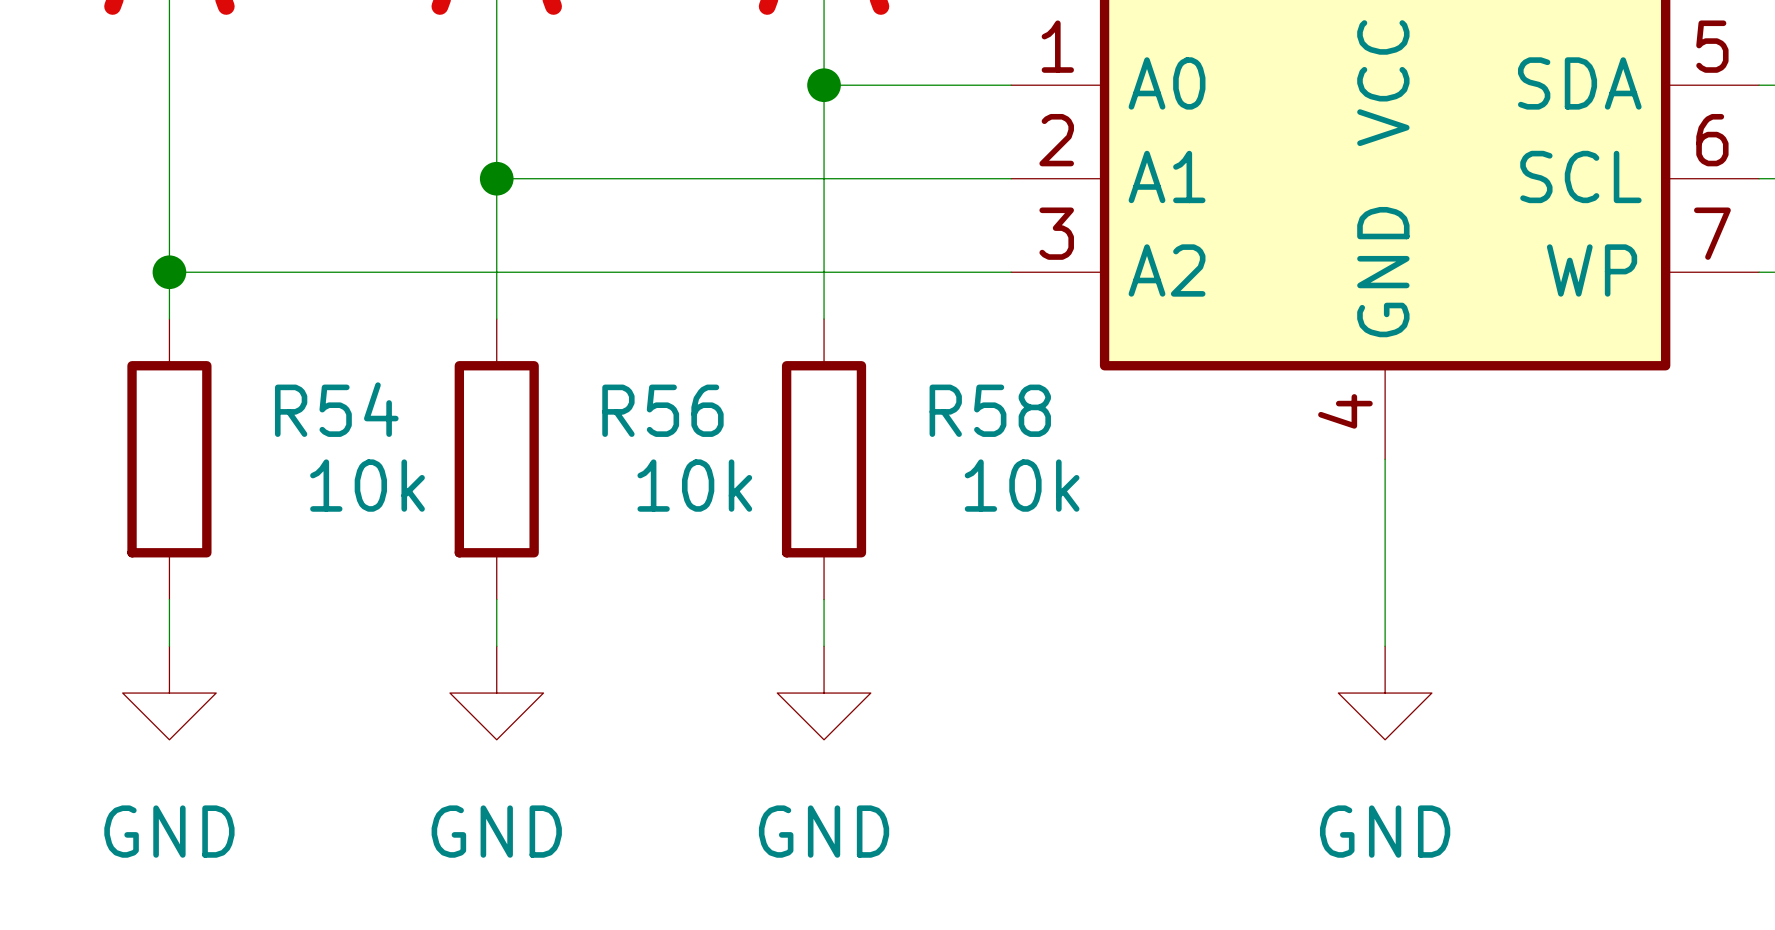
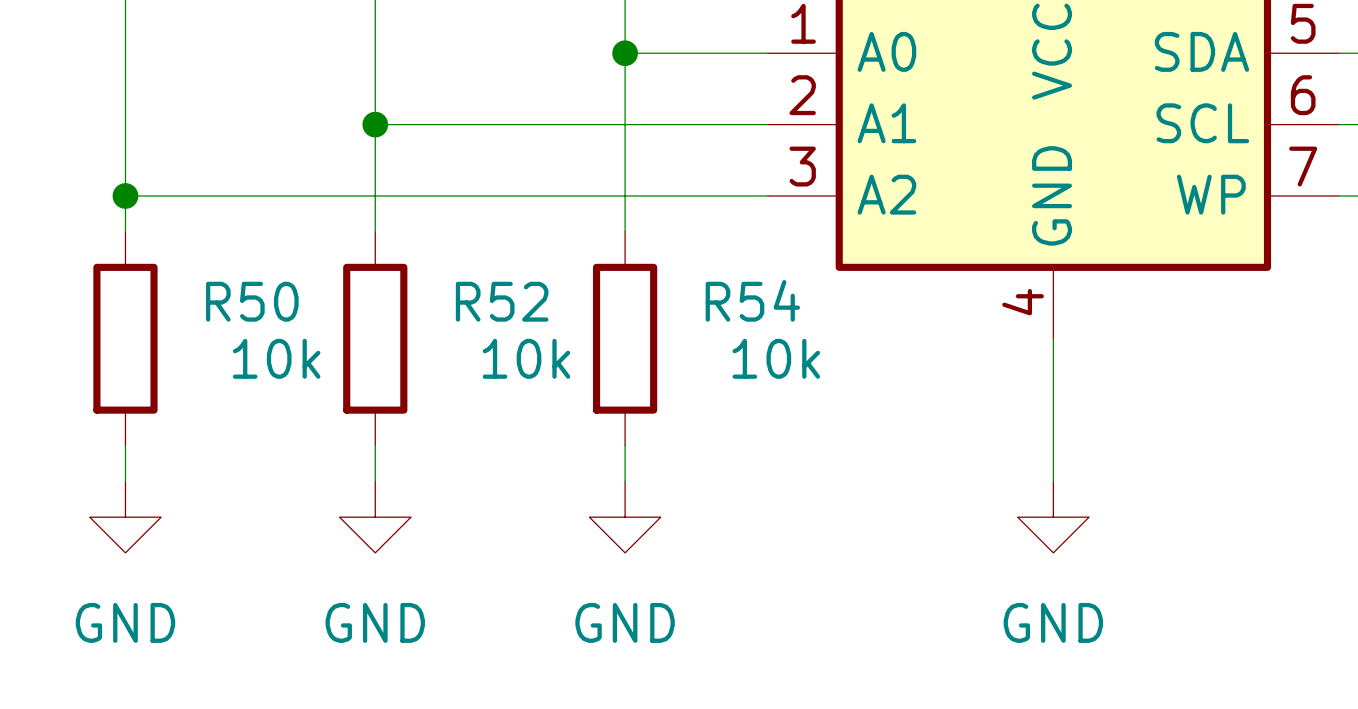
R54 name: R54 (336, 409) -> R50 (252, 301)
R56 name: R56 (662, 410) -> R52 (502, 301)
R58 name: R58 (990, 410) -> R54 (752, 300)

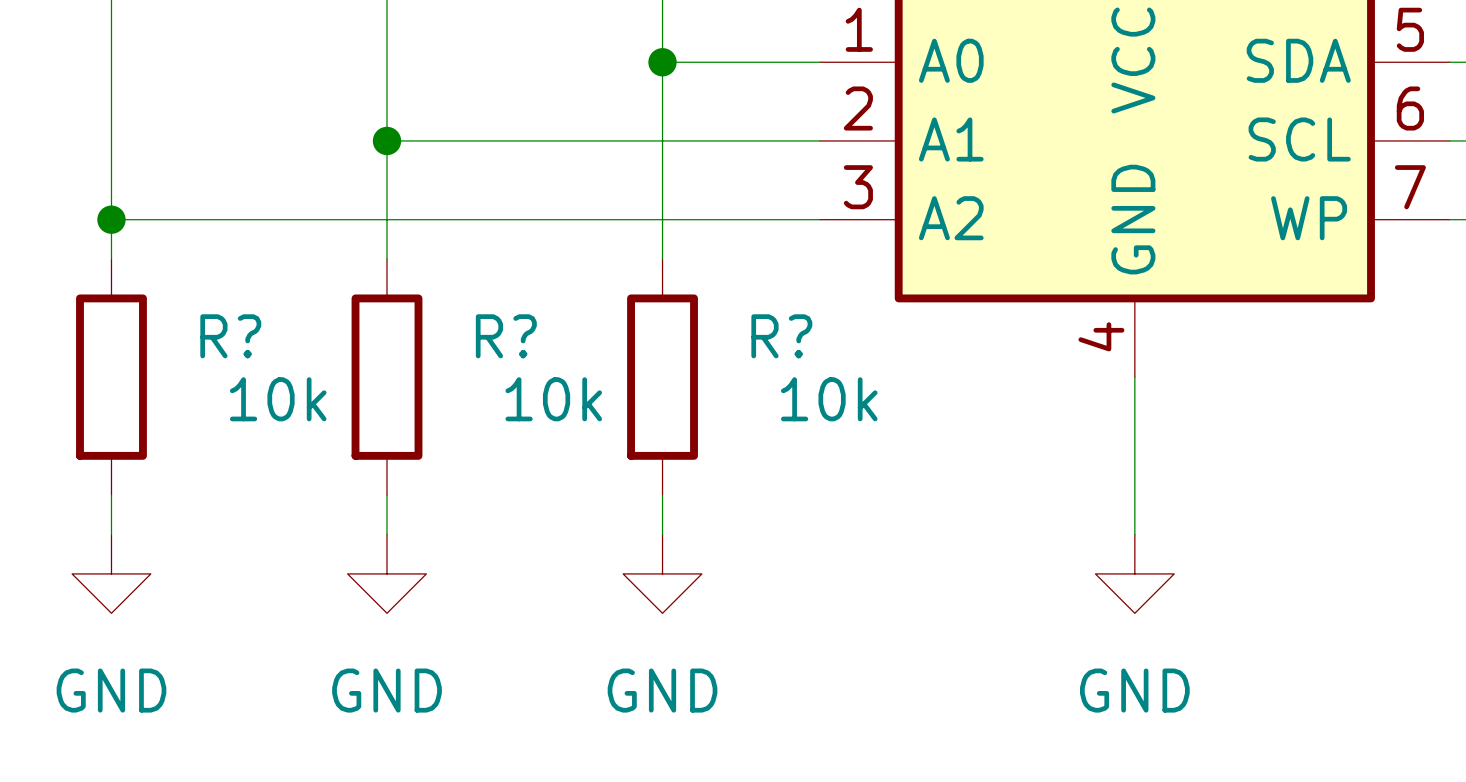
R54 name: R54 (752, 300) -> R? (781, 336)
R50 name: R50 (252, 301) -> R? (230, 336)
R52 name: R52 (502, 301) -> R? (506, 336)

